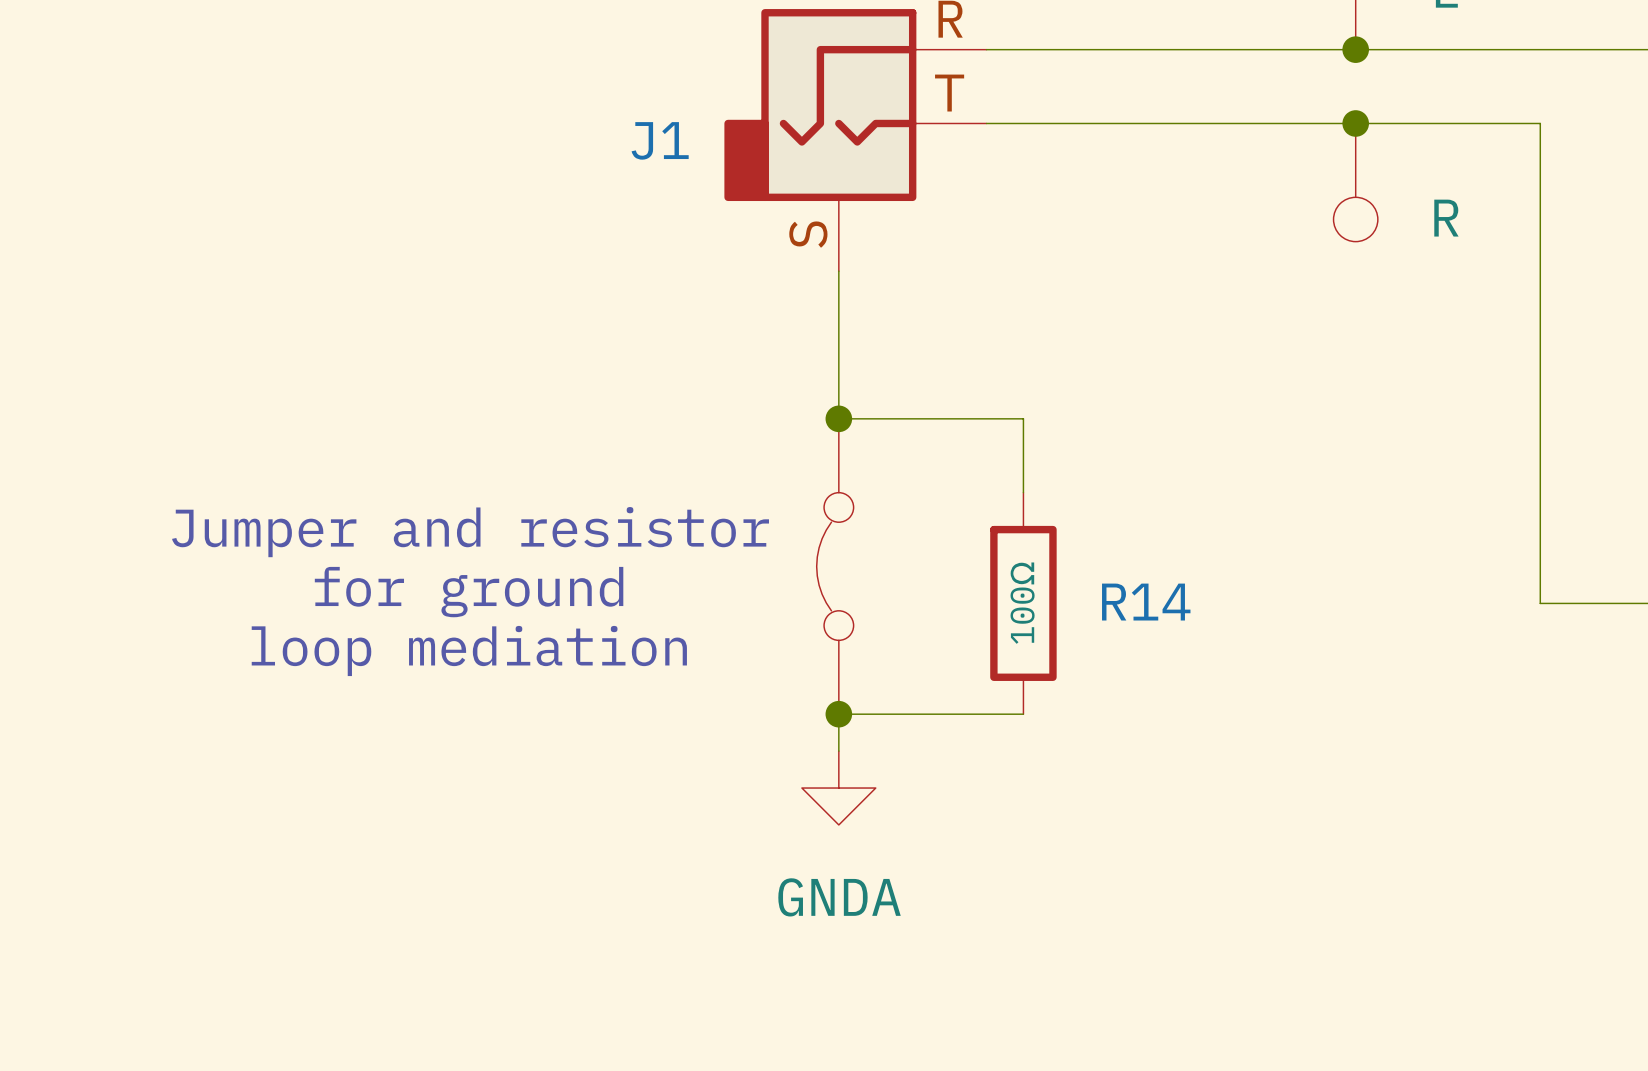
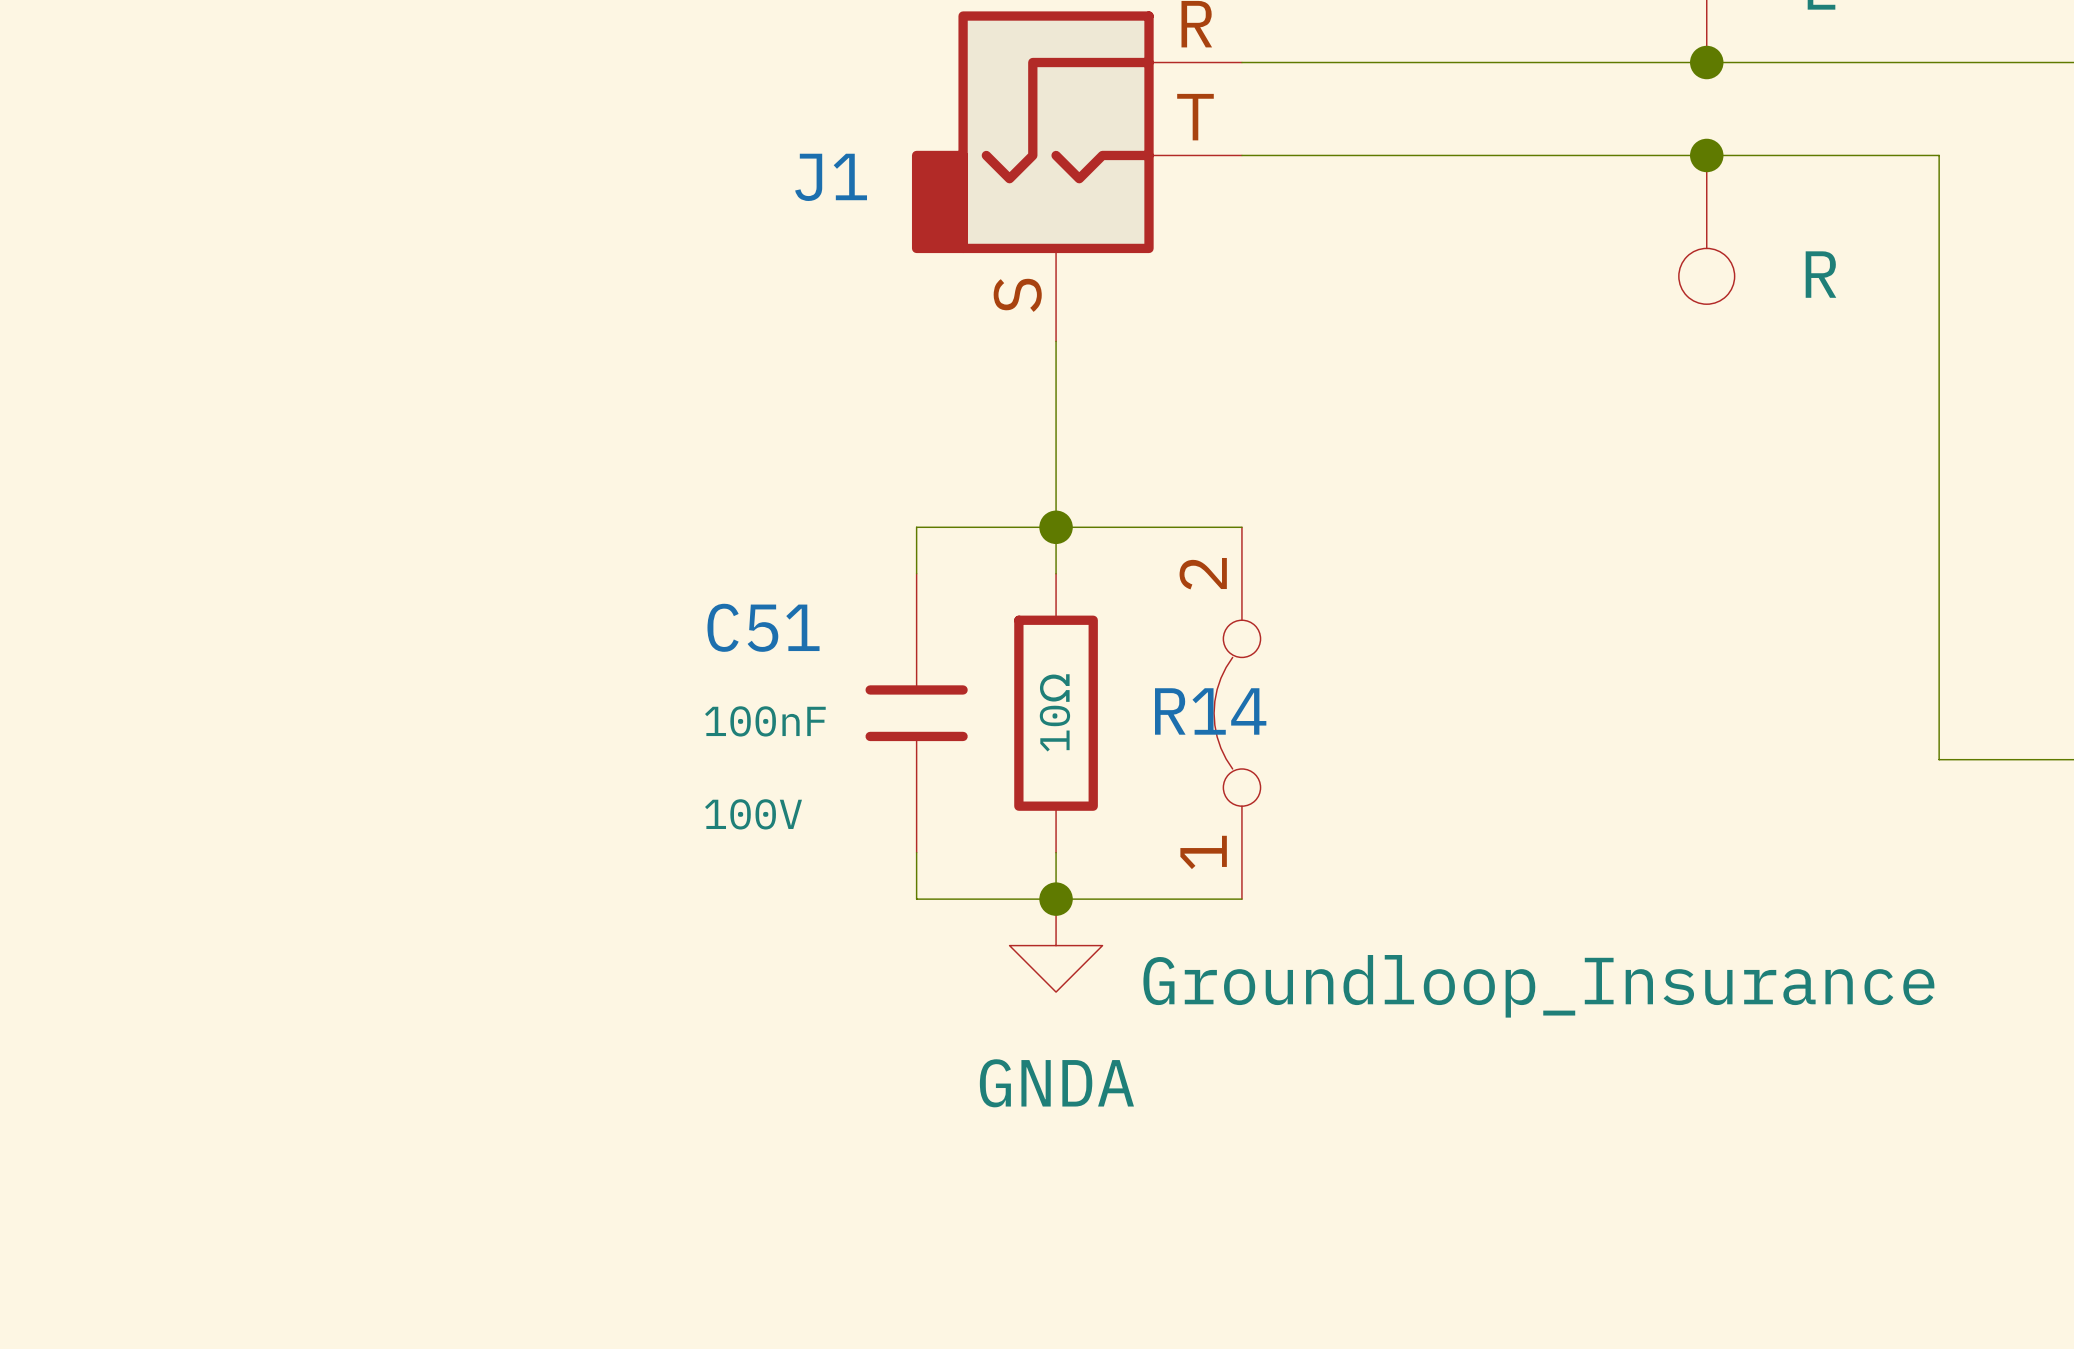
wire: (986, 418) (1023, 418) (1023, 492) -> none
wire: none -> (916, 573) (916, 527) (1056, 527) (1056, 573)
text: Jumper and resistor (470, 532) -> none
C51: none -> 100nF (916, 713)
part: (835, 566) -> none
part: none -> Groundloop_Insurance (1237, 713)
text: for ground (469, 592) -> none
R14 value: 100Ω (1022, 603) -> 10Ω (1054, 712)
R14 position: (1023, 603) -> (1056, 713)
text: loop mediation (469, 650) -> none
wire: none -> (916, 852) (916, 899) (1056, 899) (1056, 852)
wire: (986, 714) (1023, 714) -> none
power symbol position: GNDA (838, 788) -> GNDA (1056, 945)

